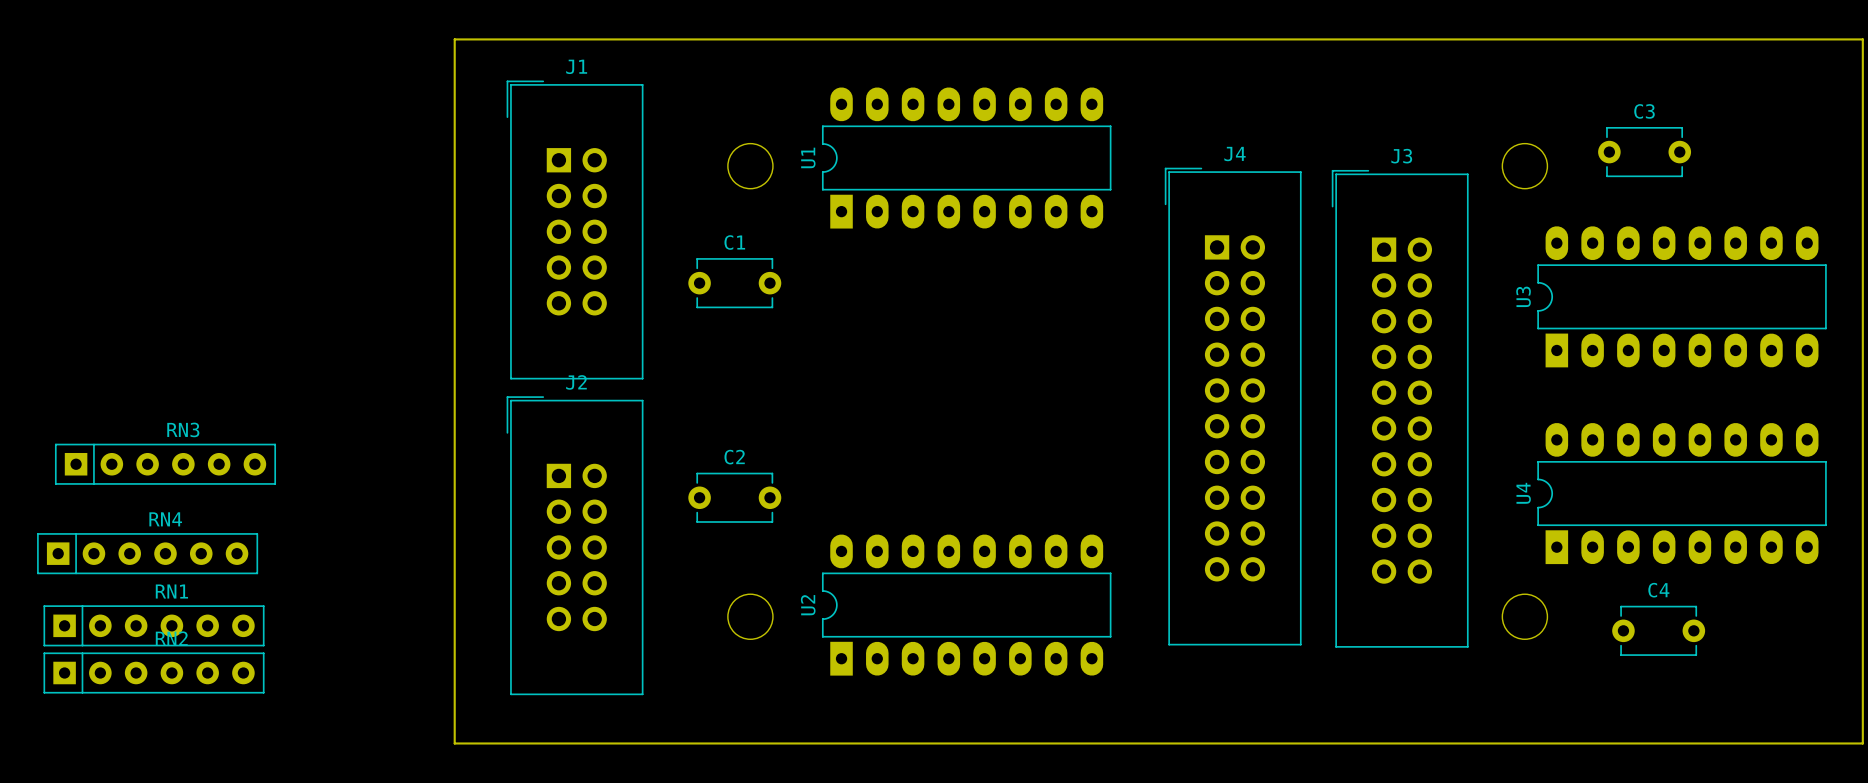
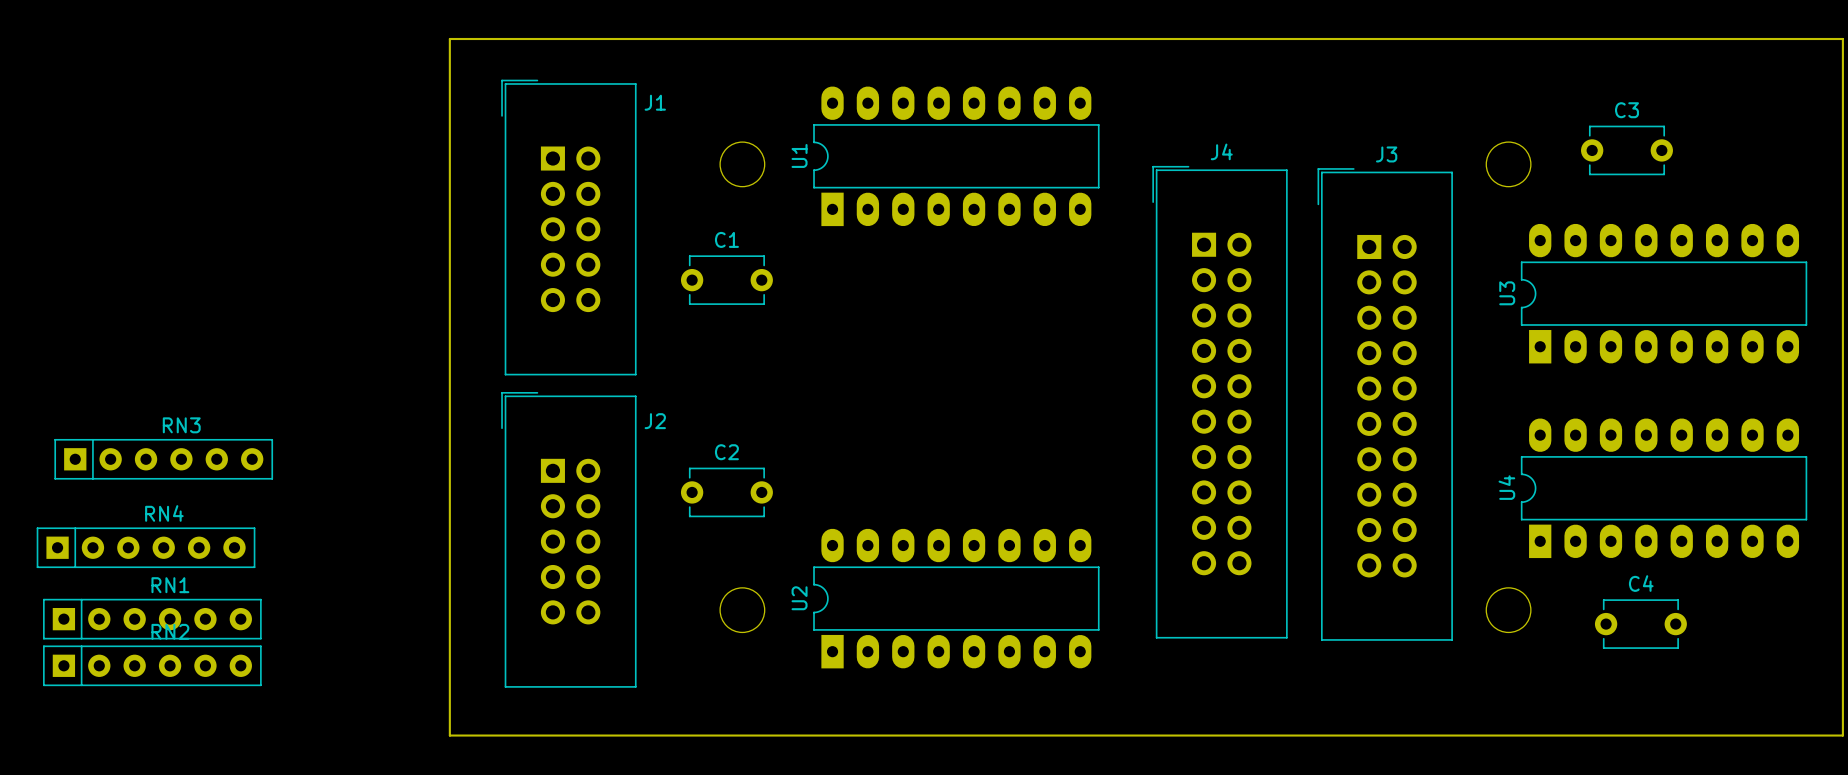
J1 name position: J1 (576, 66) -> J1 (655, 102)
J2 name position: J2 (576, 382) -> J2 (655, 421)

